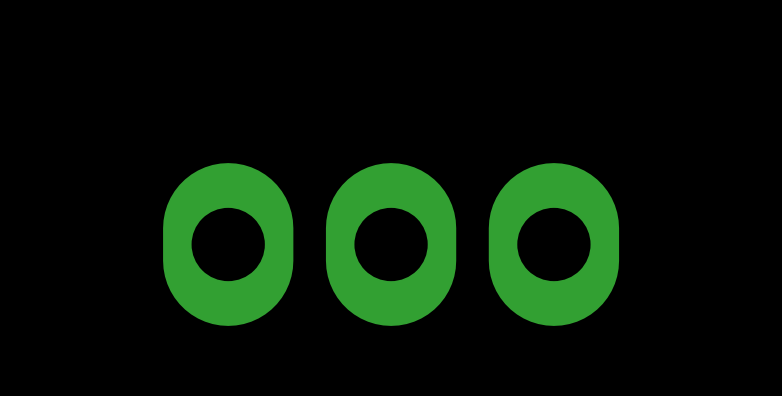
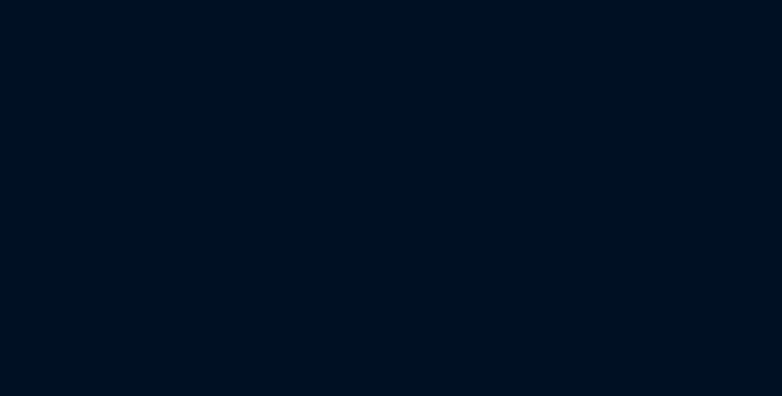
part: (391, 244) -> none

